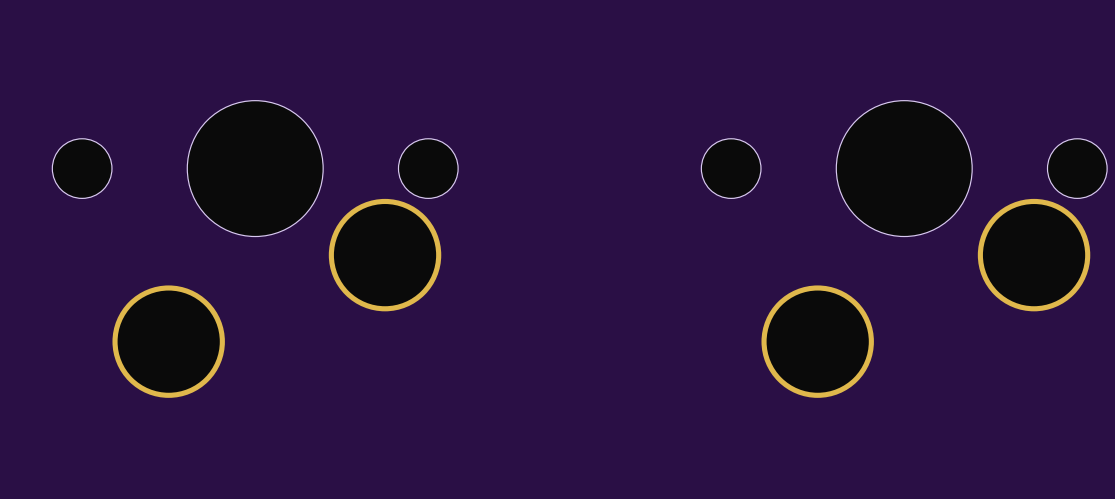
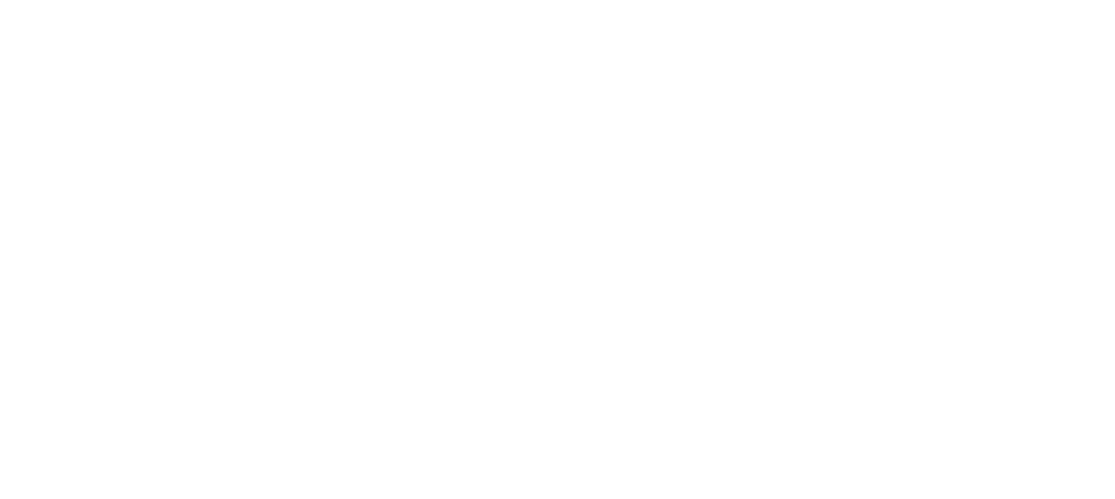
part: (255, 249) -> none
part: (904, 249) -> none

